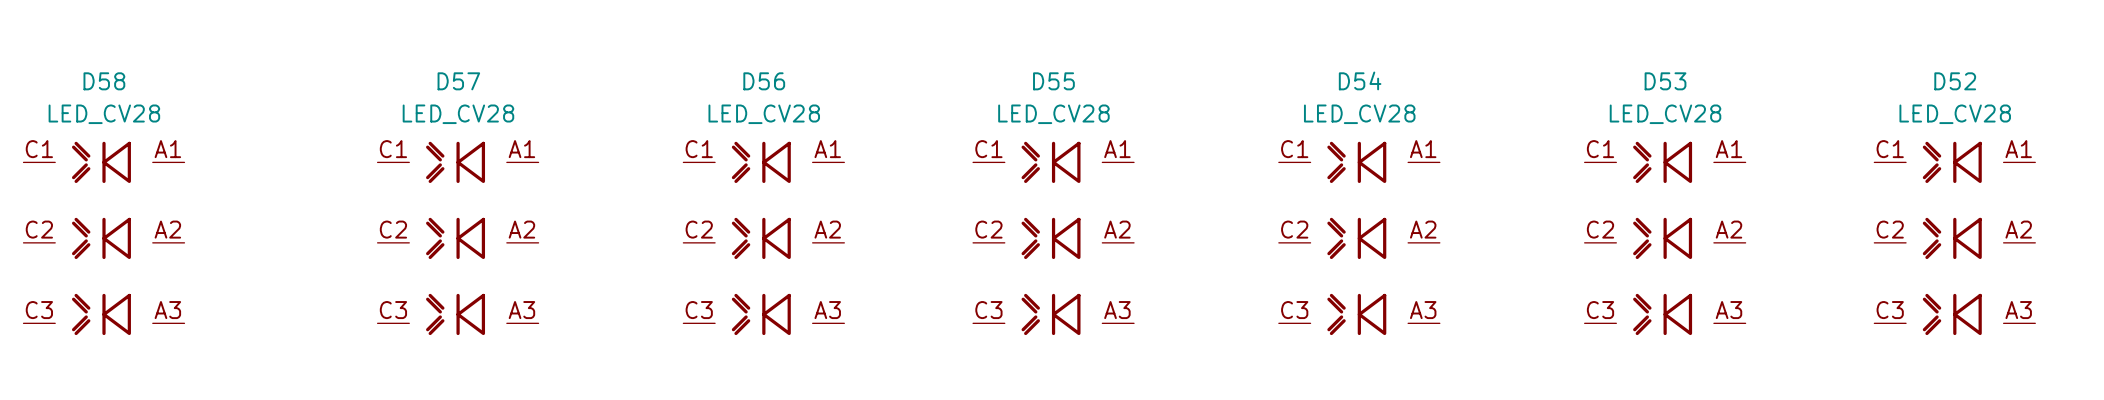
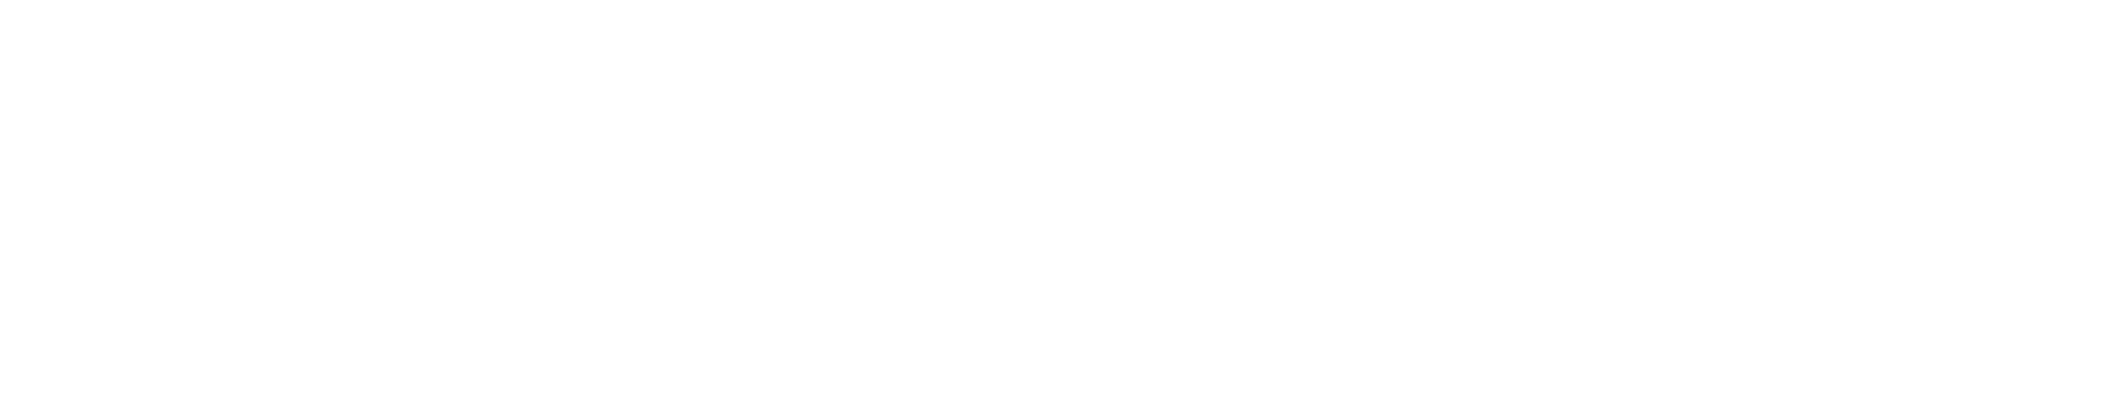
D58: LED_CV28 (104, 238) -> none
D57: LED_CV28 (458, 238) -> none
D56: LED_CV28 (763, 238) -> none
D55: LED_CV28 (1053, 238) -> none
D54: LED_CV28 (1359, 238) -> none
D53: LED_CV28 (1665, 238) -> none
D52: LED_CV28 (1954, 238) -> none

